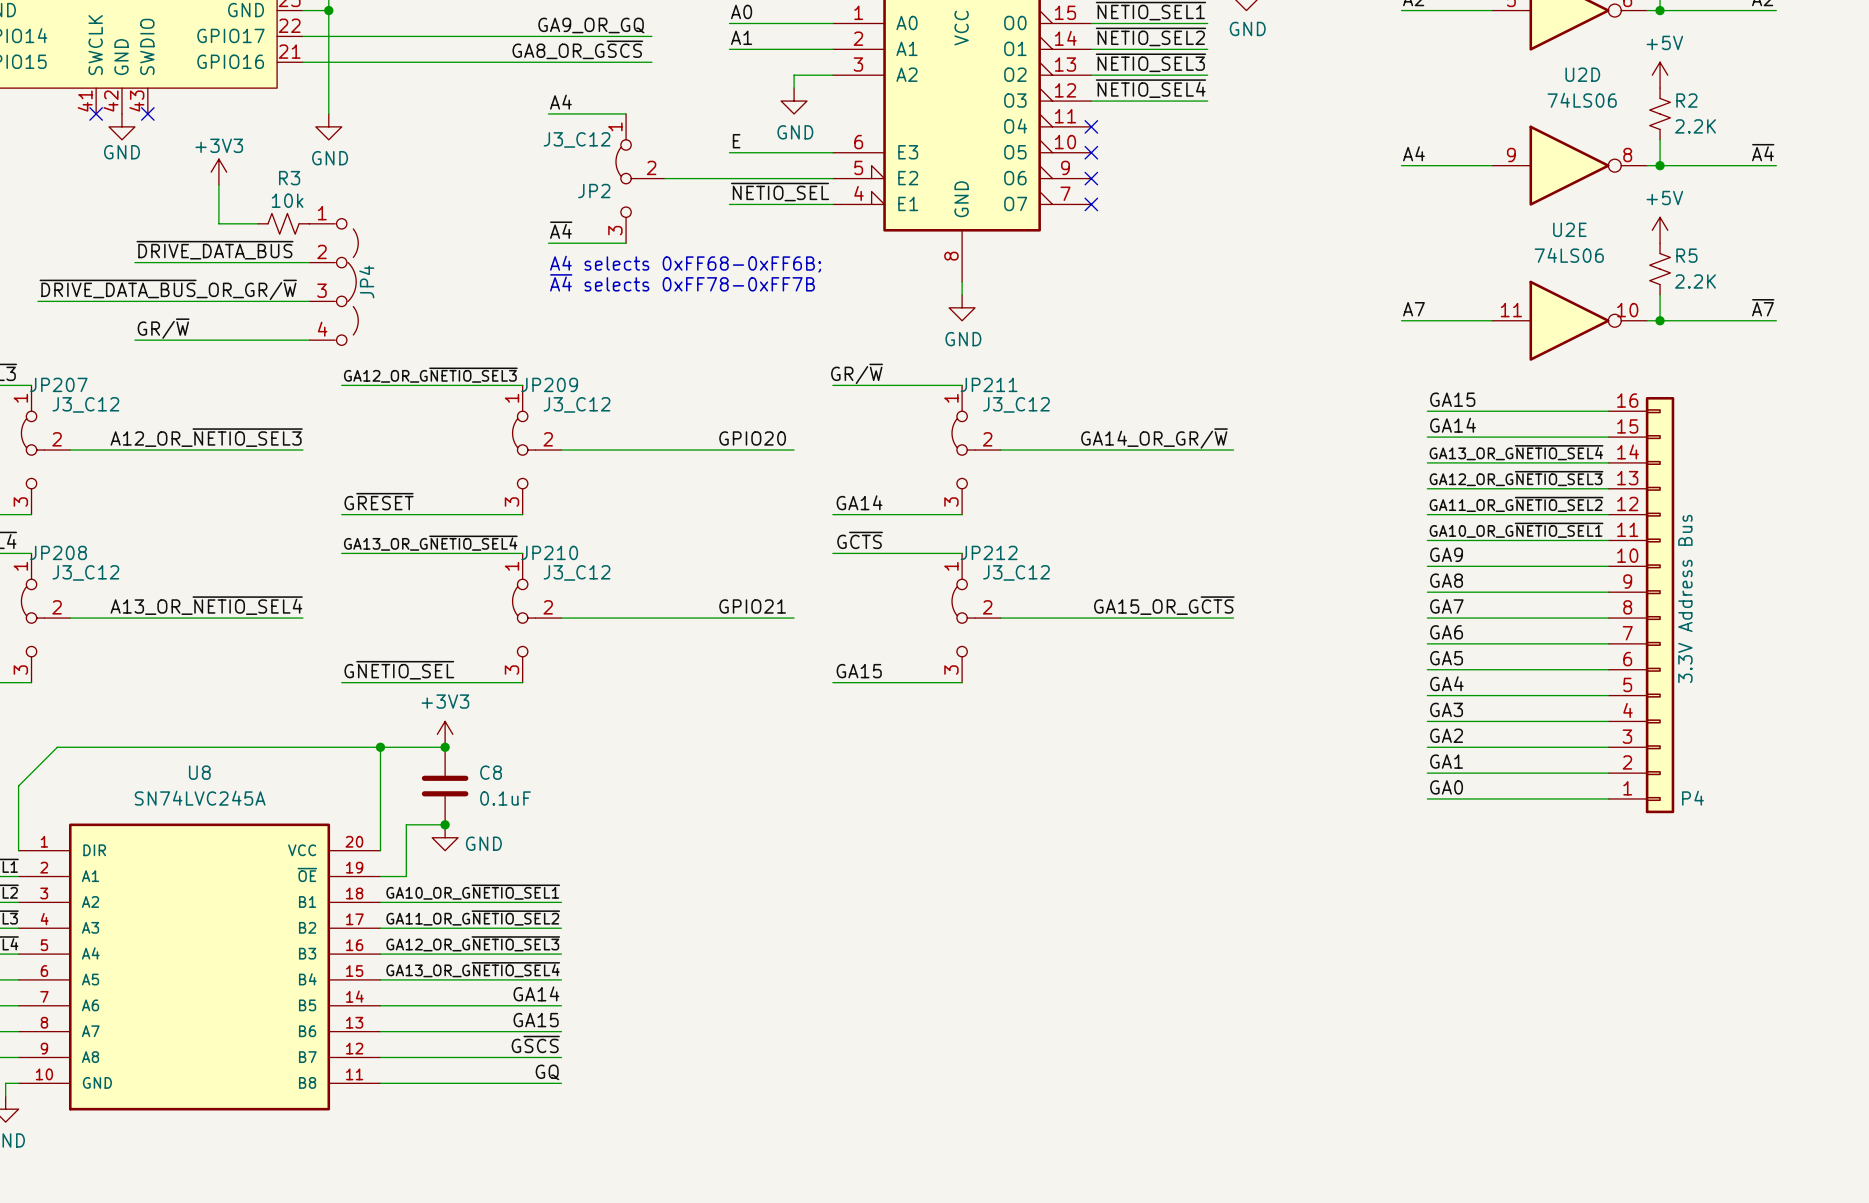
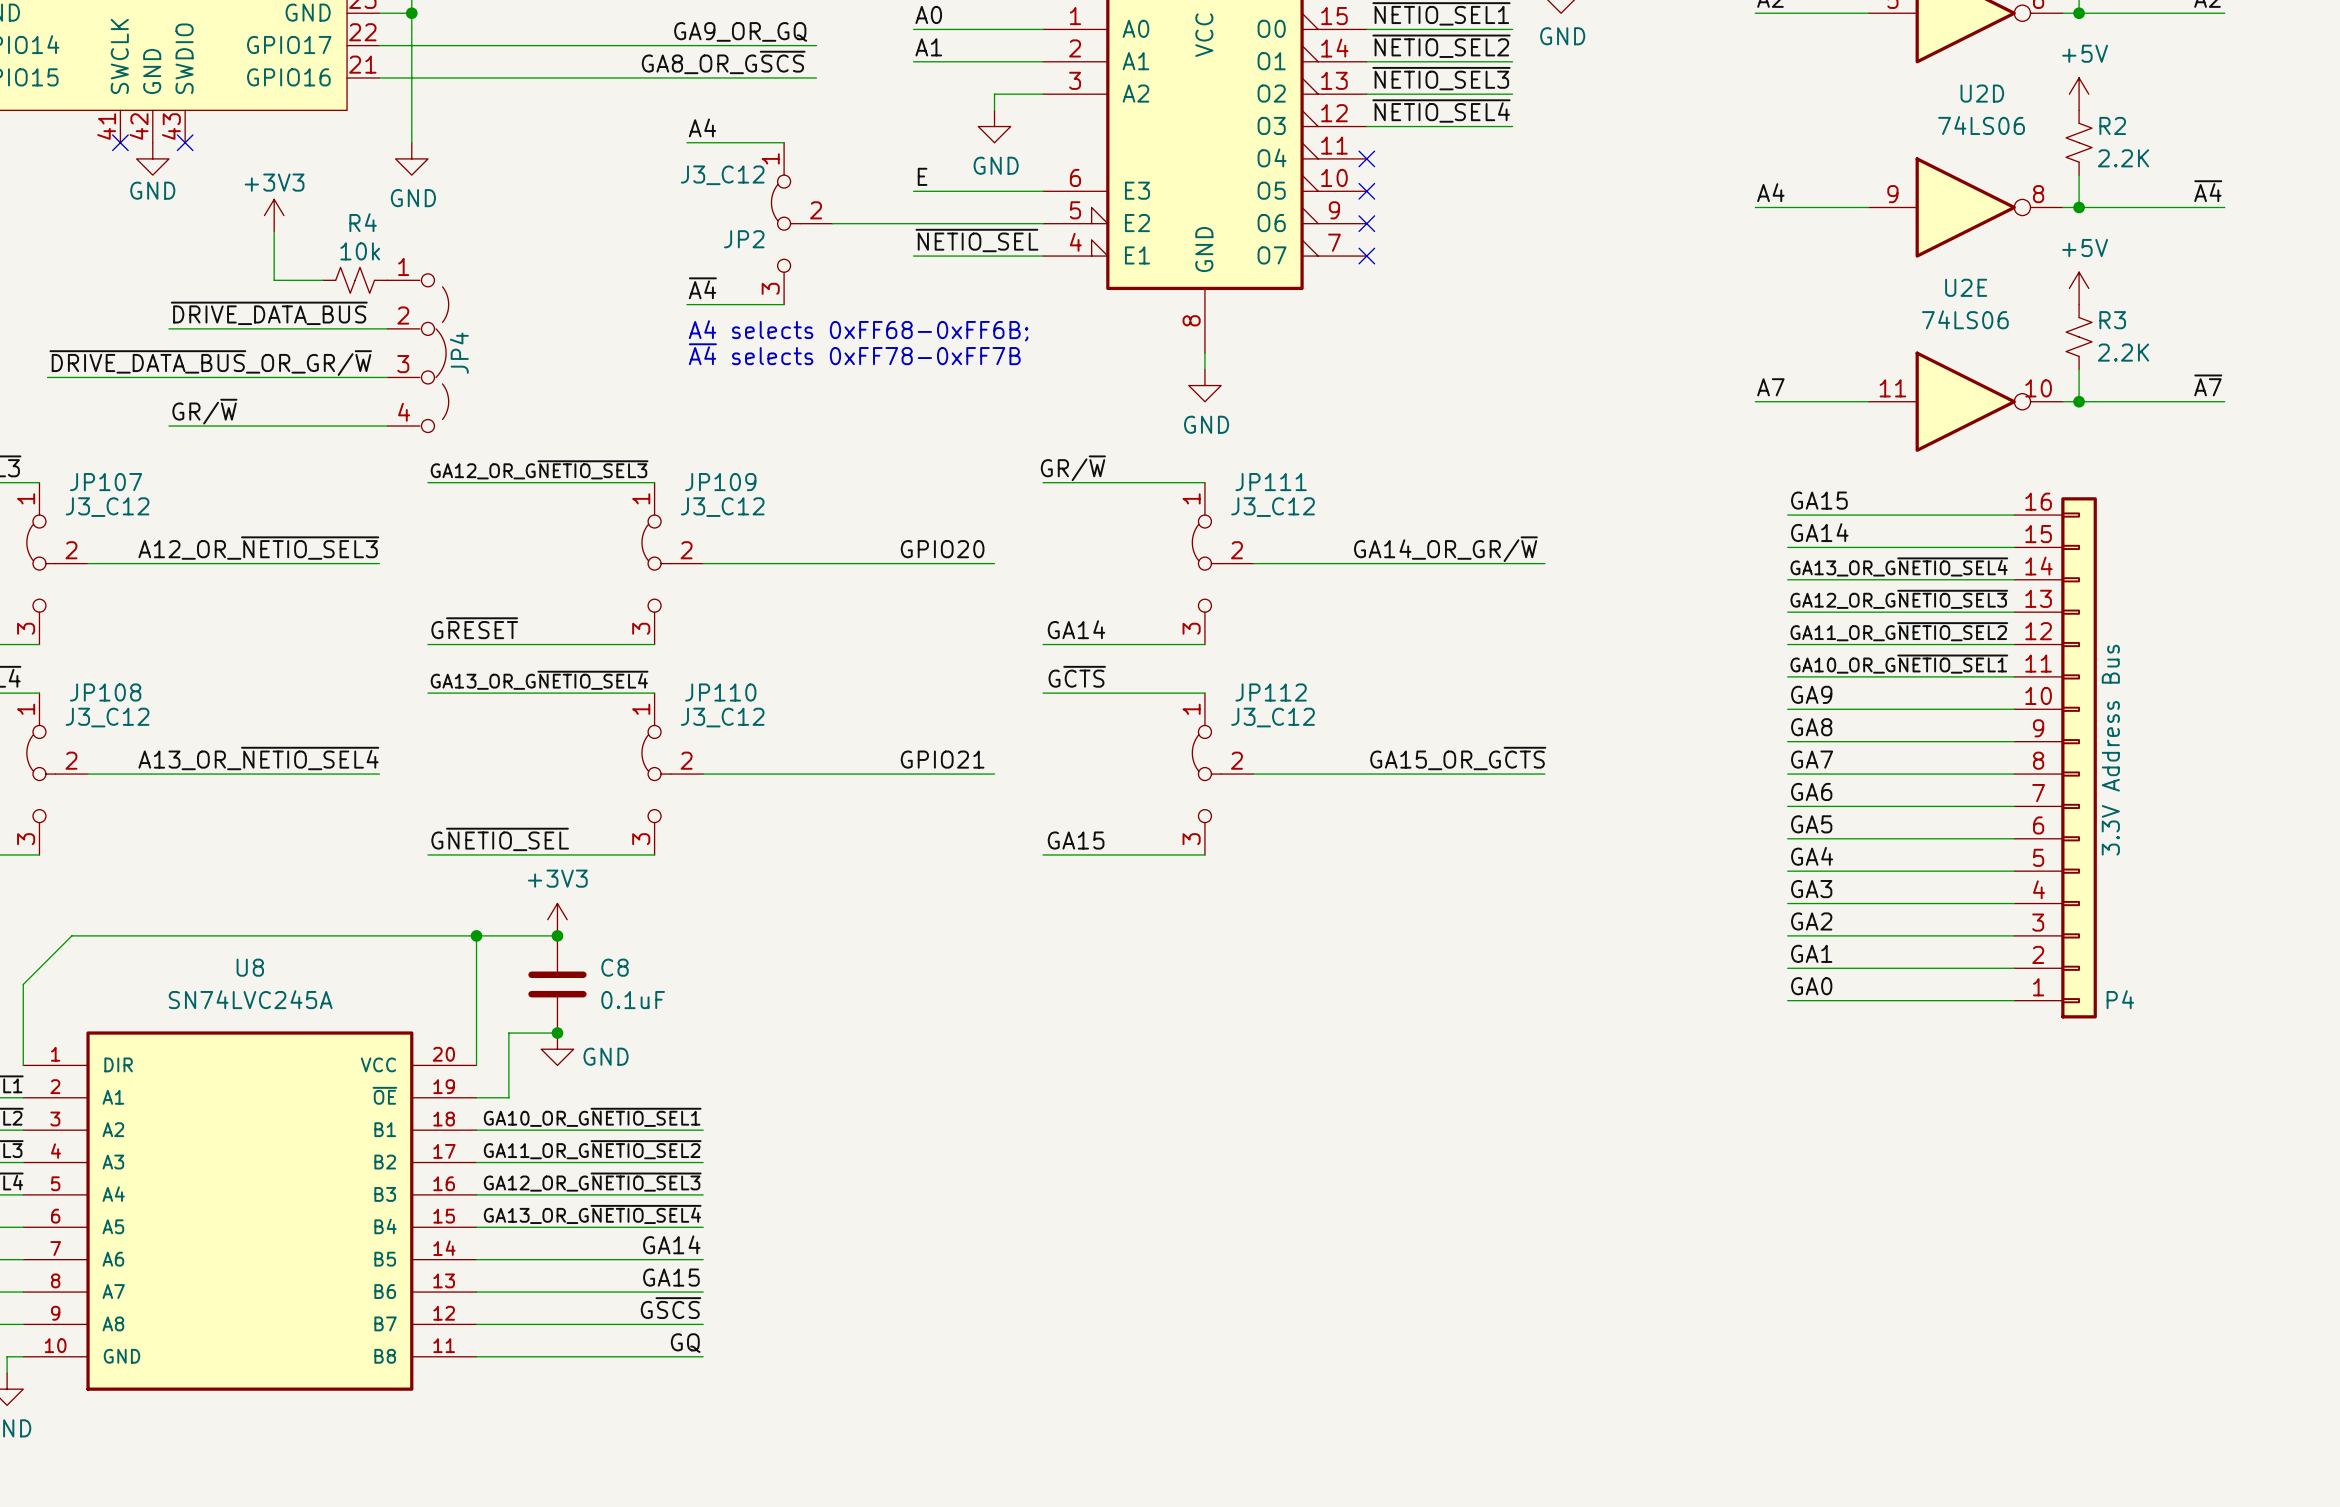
R3 name: R3 (289, 178) -> R4 (363, 222)
R5 name: R5 (1686, 255) -> R3 (2112, 320)
JP207 name: JP207 (58, 384) -> JP107 (106, 482)
JP209 name: JP209 (549, 384) -> JP109 (720, 482)
JP211 name: JP211 (989, 384) -> JP111 (1271, 482)
JP208 name: JP208 (58, 552) -> JP108 (105, 692)
JP210 name: JP210 (549, 552) -> JP110 (720, 692)
JP212 name: JP212 (989, 552) -> JP112 (1271, 692)

